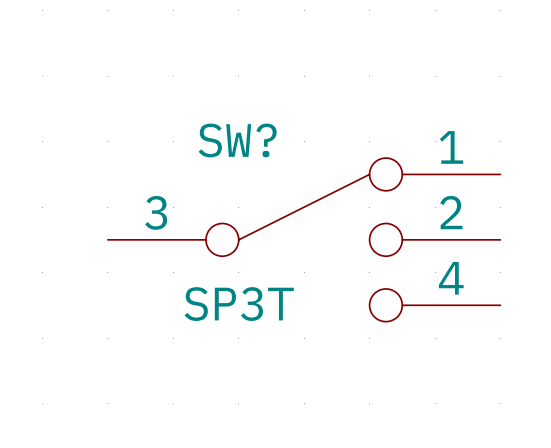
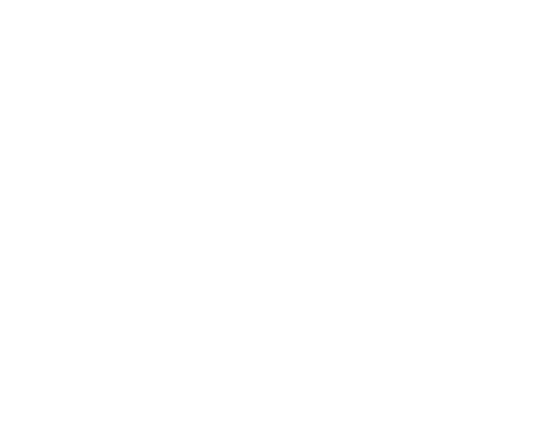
SW?: SP3T (304, 239) -> none

